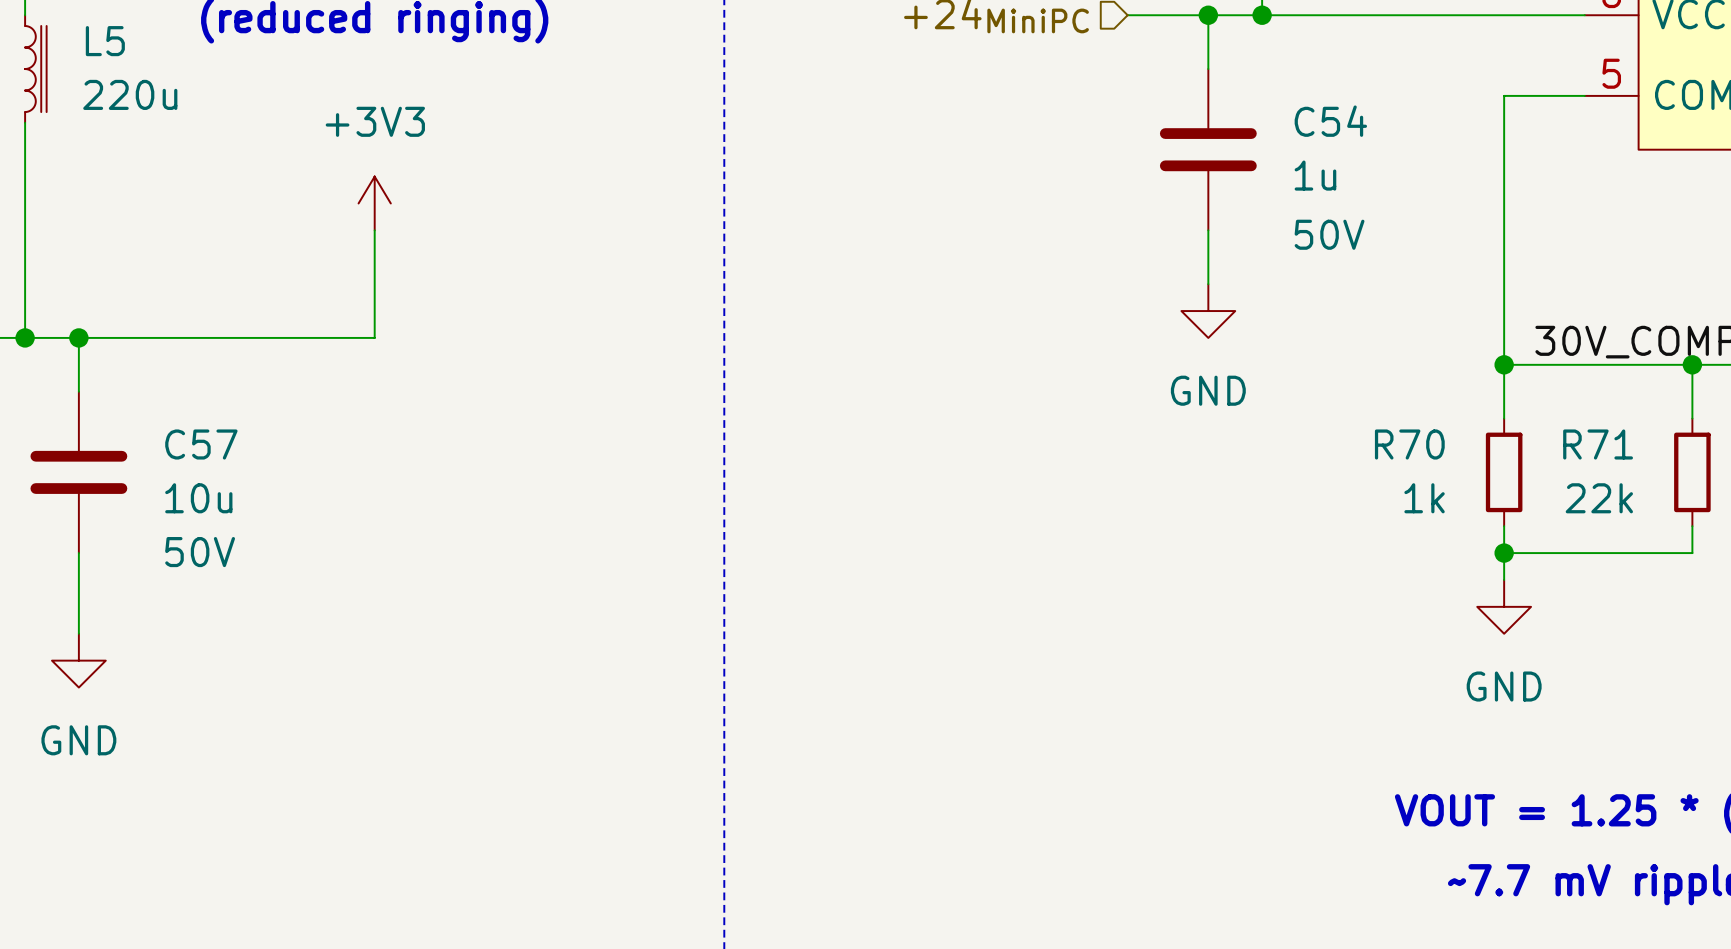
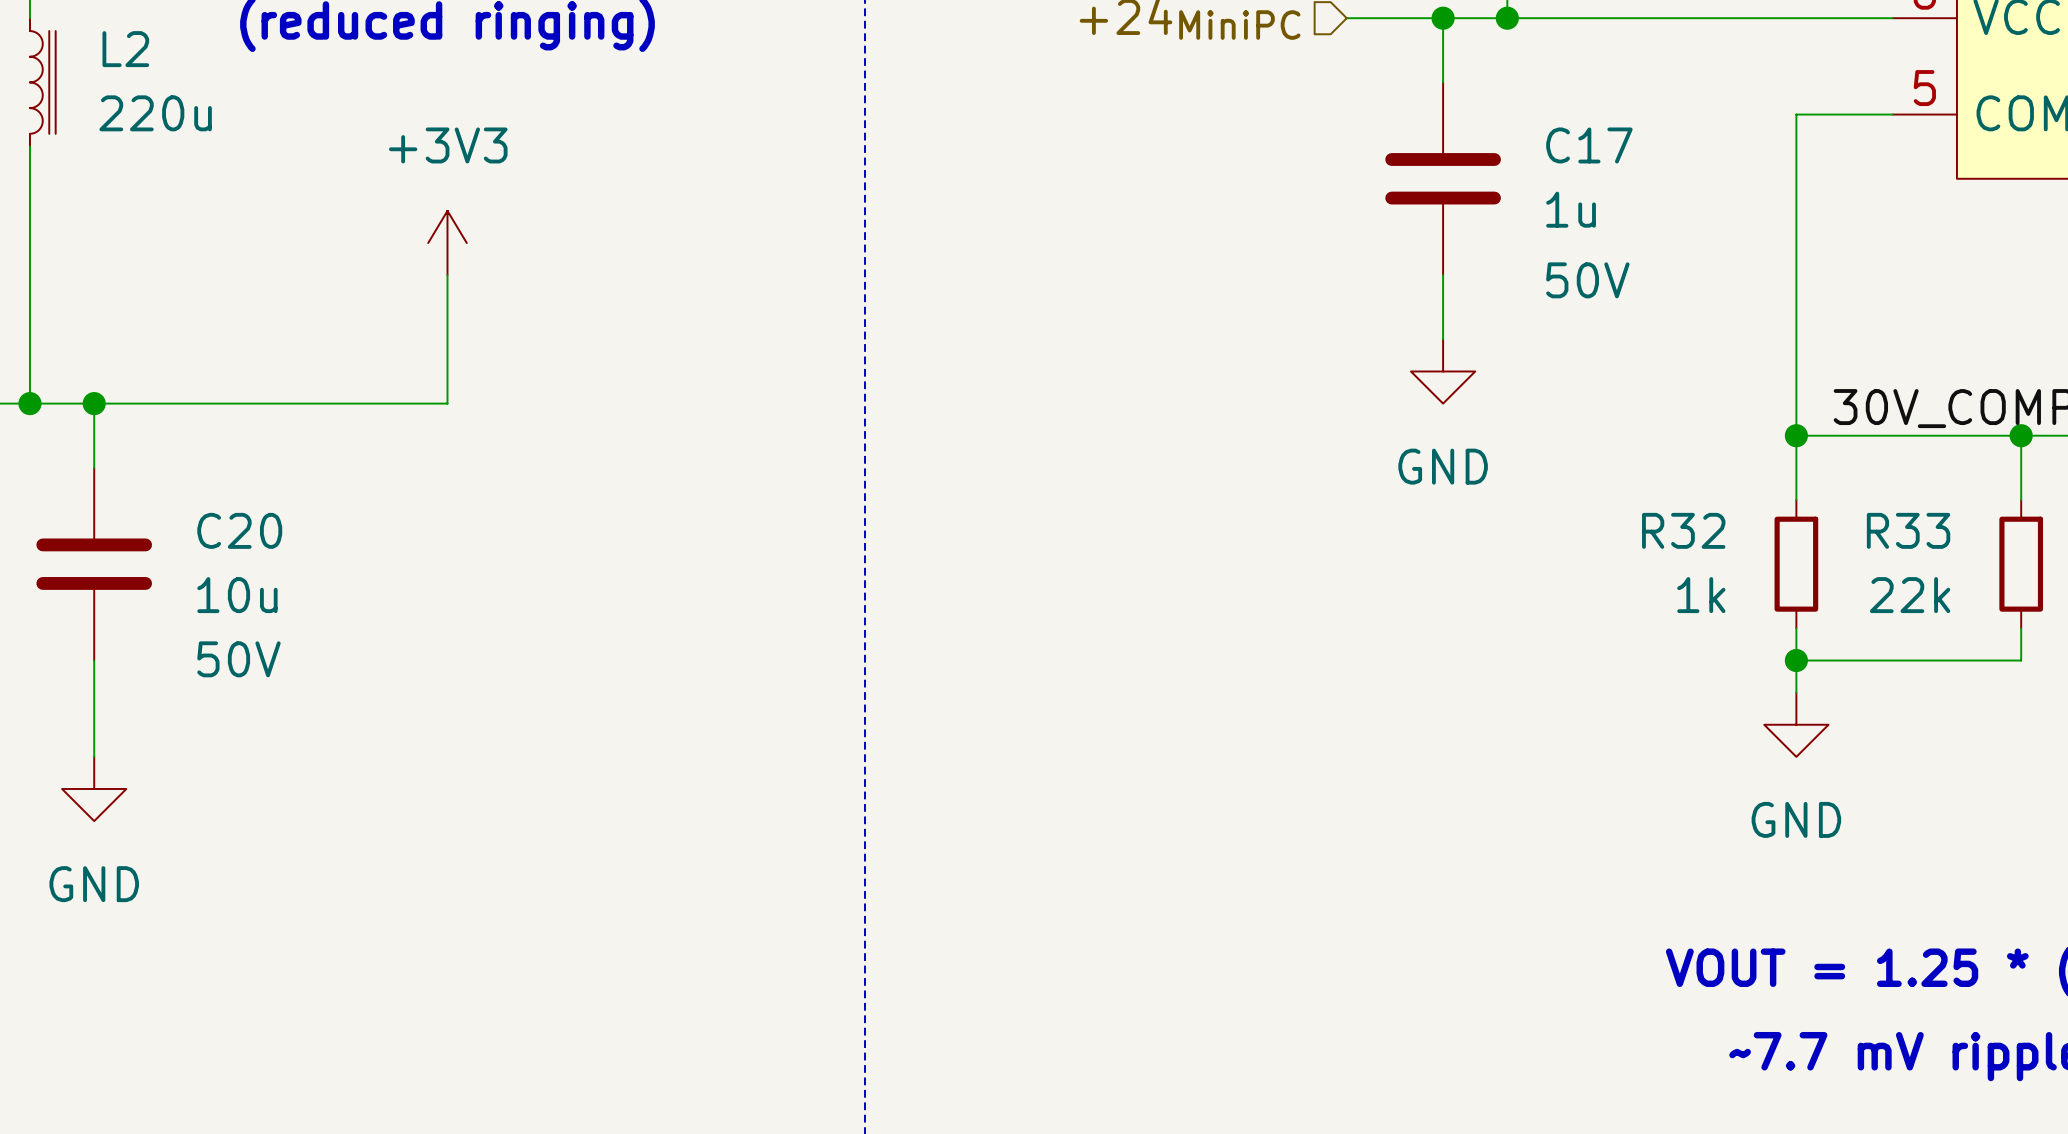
L5 name: L5 (105, 41) -> L2 (125, 49)
C54 name: C54 (1330, 121) -> C17 (1589, 145)
C57 name: C57 (201, 444) -> C20 (239, 530)
R70 name: R70 (1409, 444) -> R32 (1683, 530)
R71 name: R71 (1598, 444) -> R33 (1908, 530)

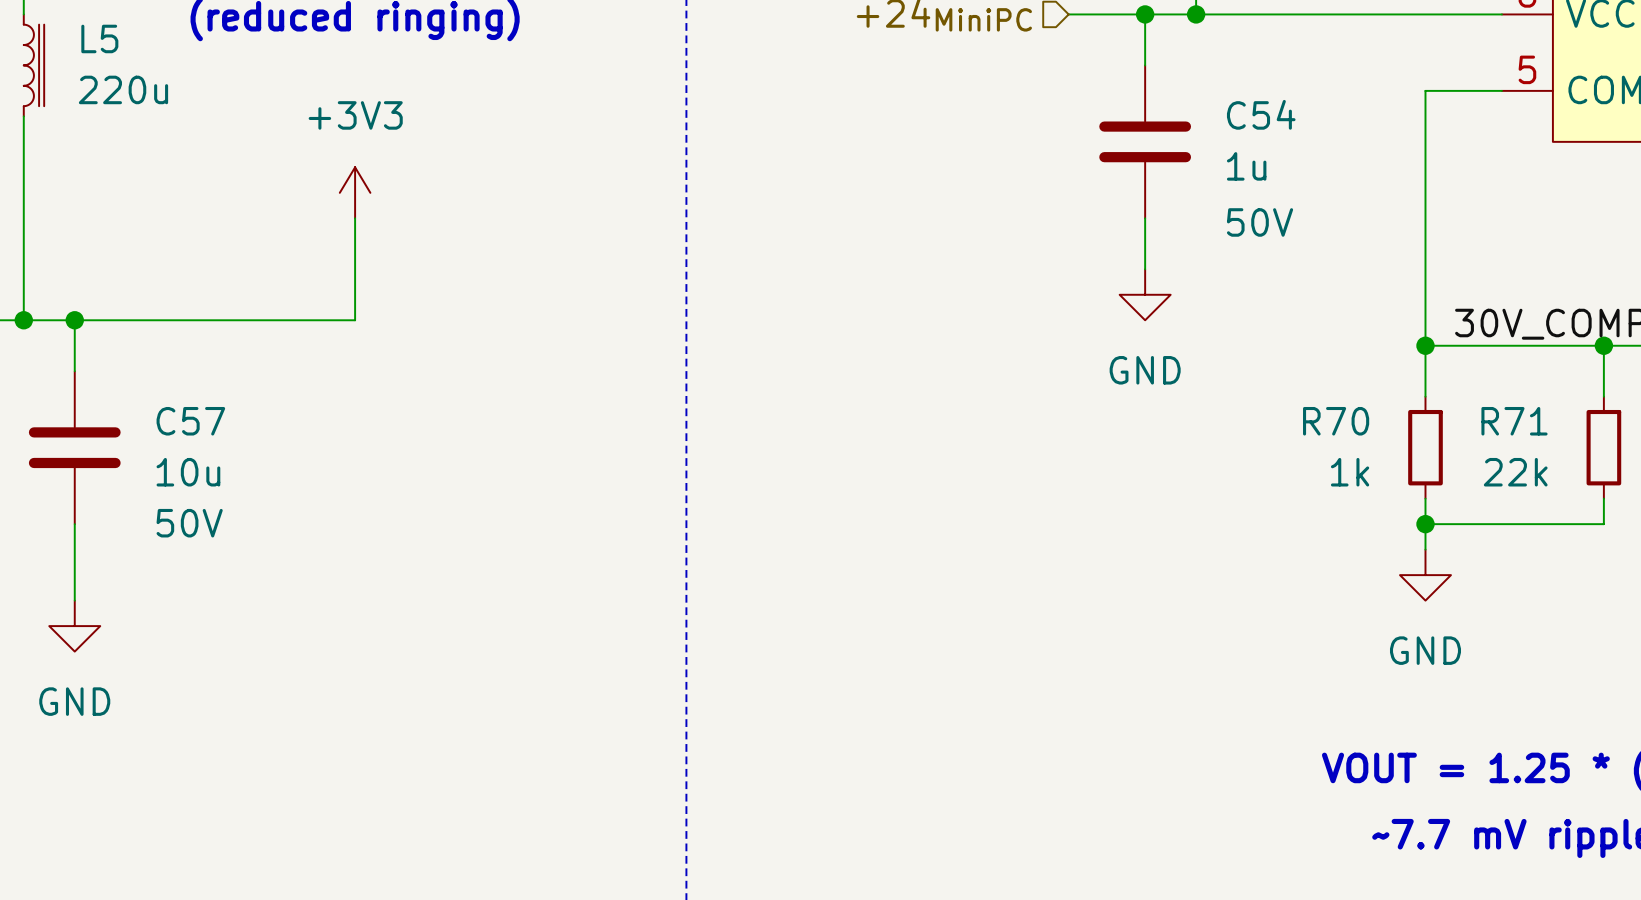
L2 name: L2 (125, 49) -> L5 (99, 38)
C17 name: C17 (1589, 145) -> C54 (1261, 114)
C20 name: C20 (239, 530) -> C57 (190, 421)
R32 name: R32 (1683, 530) -> R70 (1336, 421)
R33 name: R33 (1908, 530) -> R71 (1514, 421)

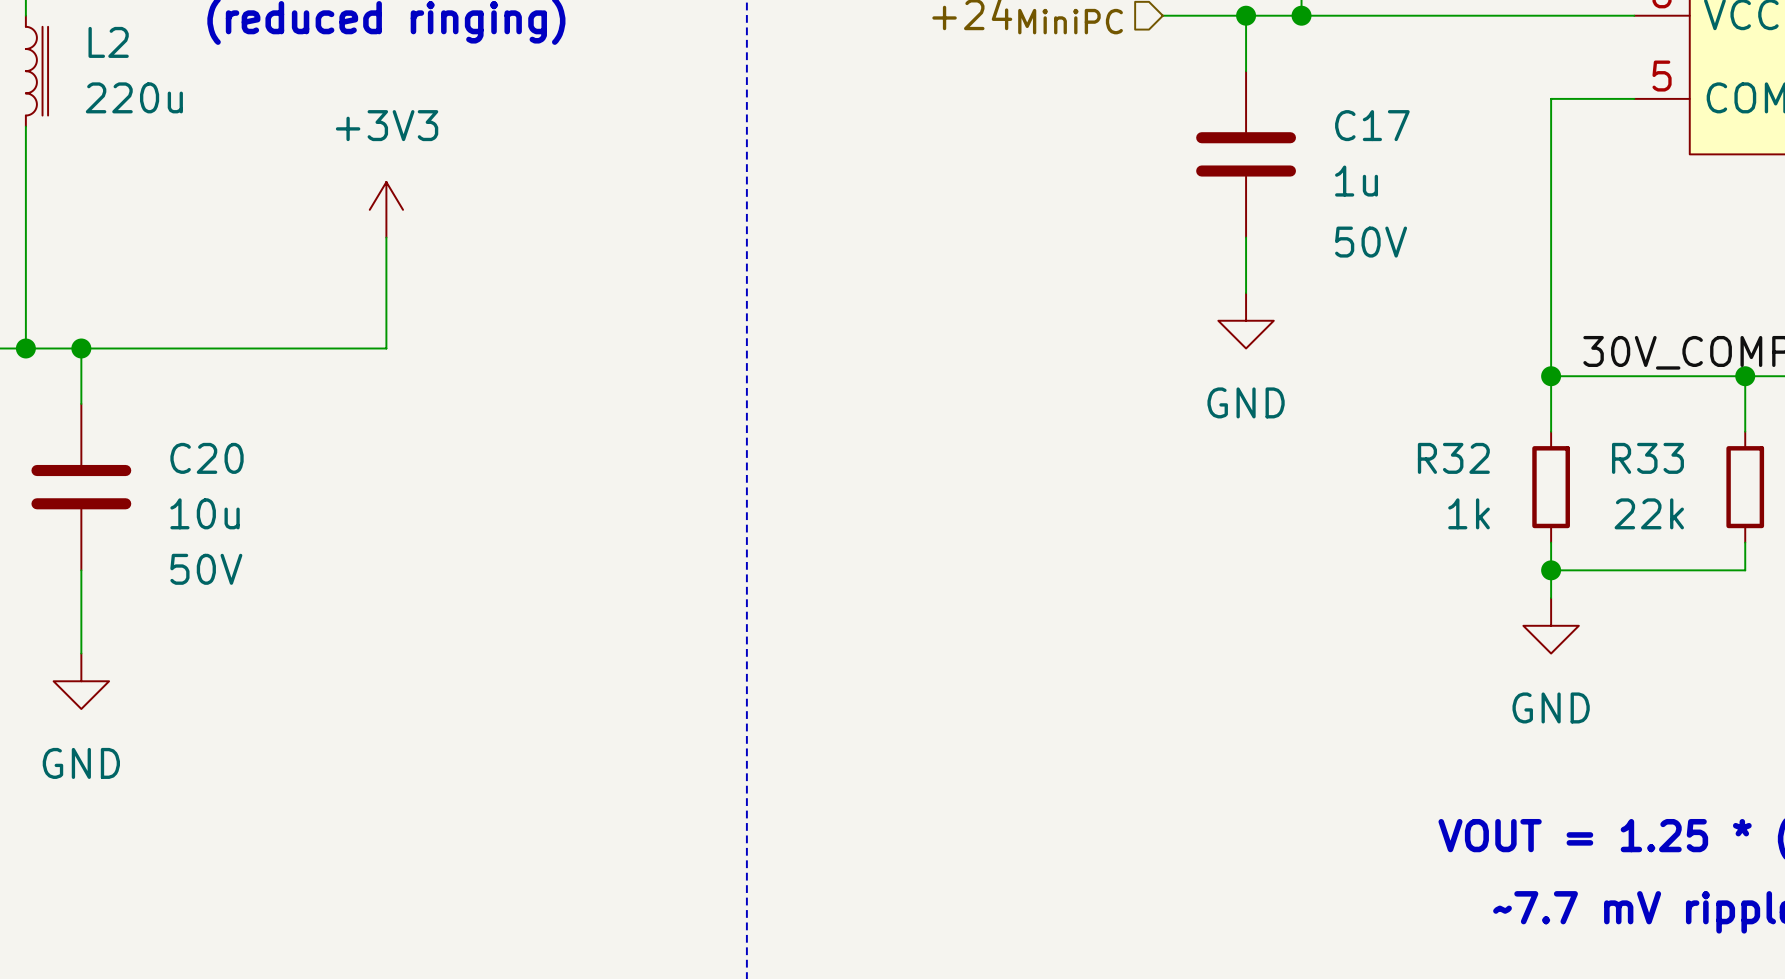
L5 name: L5 (99, 38) -> L2 (108, 42)
C54 name: C54 (1261, 114) -> C17 (1372, 125)
C57 name: C57 (190, 421) -> C20 (207, 458)
R70 name: R70 (1336, 421) -> R32 (1453, 458)
R71 name: R71 (1514, 421) -> R33 (1647, 458)

